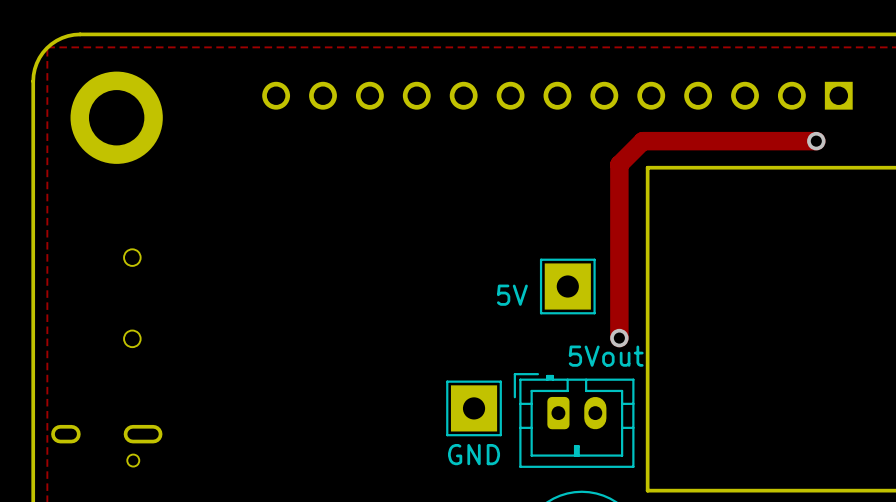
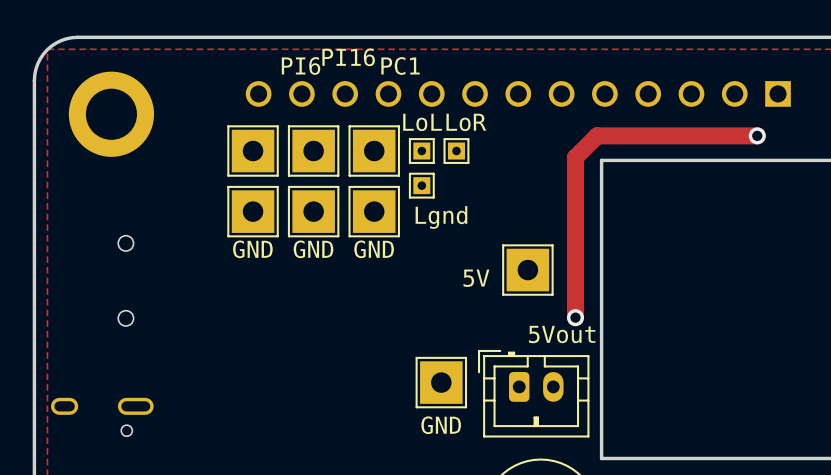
part: none -> PI6 (253, 151)
part: none -> PI16 (313, 151)
part: none -> PC1 (374, 151)
part: none -> LoL (421, 151)
part: none -> LoR (456, 151)
part: none -> Lgnd (421, 185)
part: none -> GND (253, 211)
part: none -> GND (313, 211)
part: none -> GND (374, 211)

